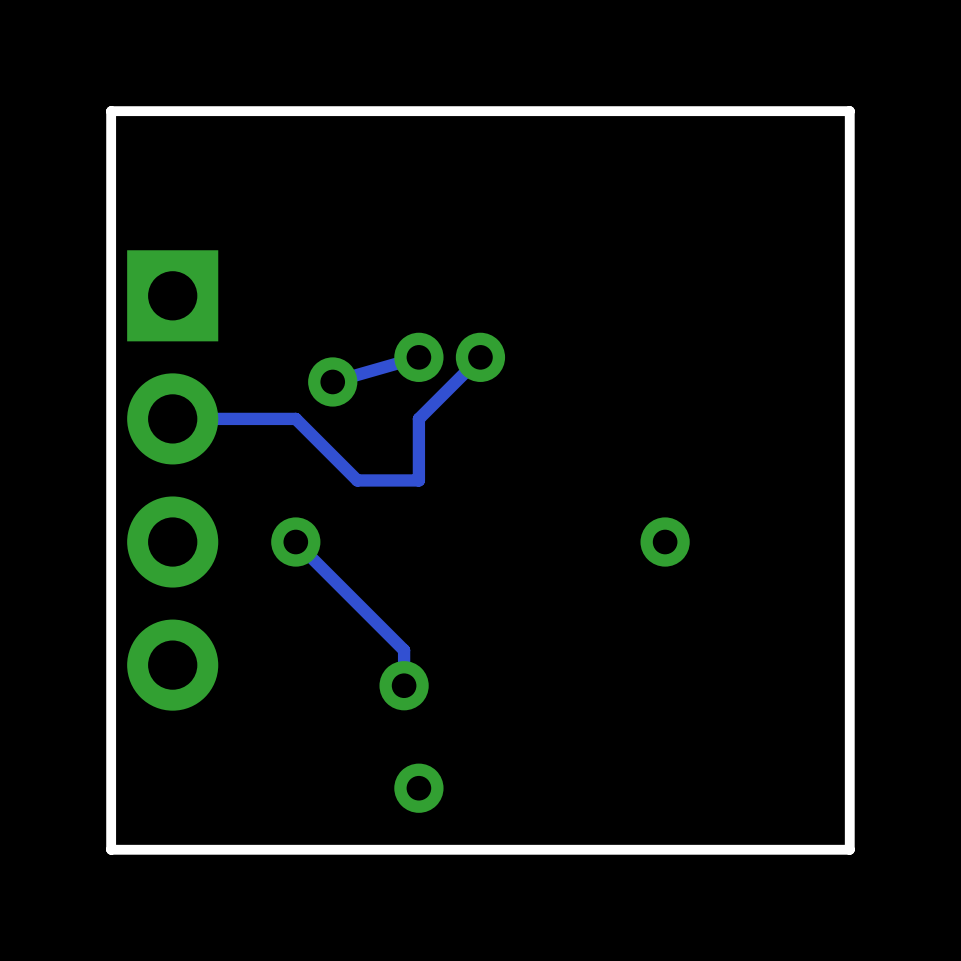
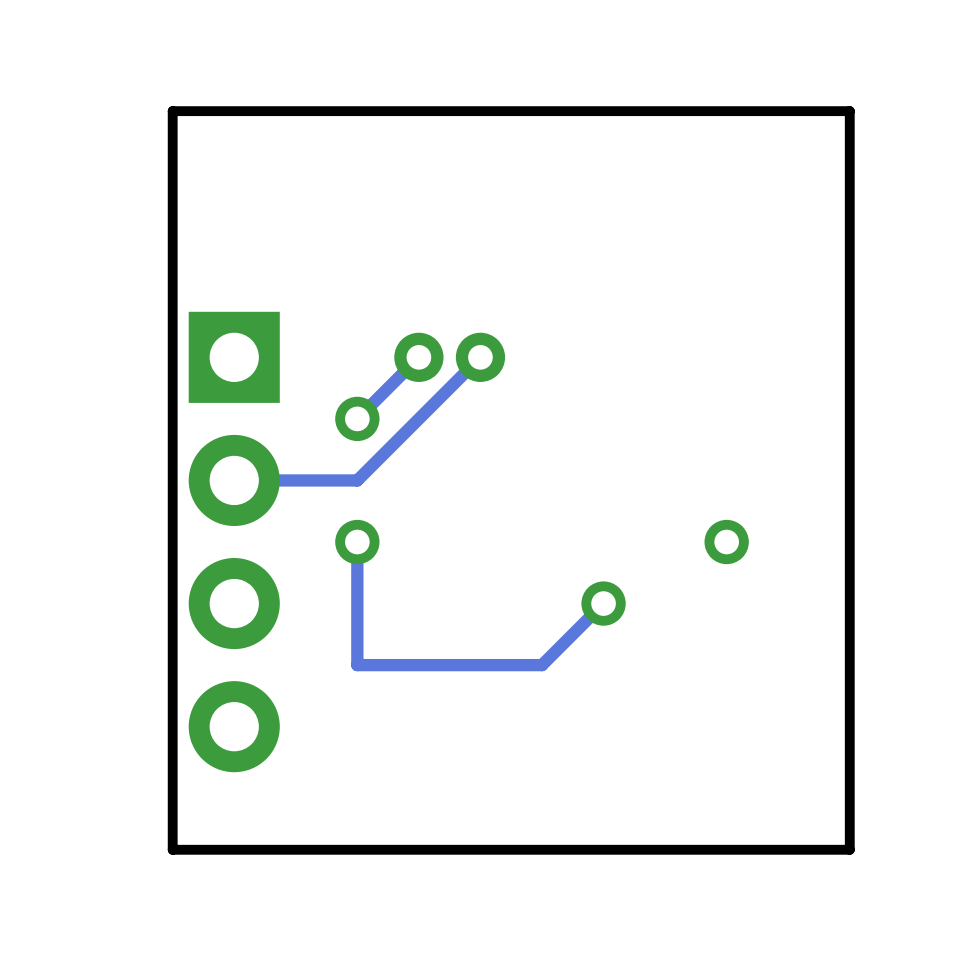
board edge: (172, 111) (111, 111) (111, 849) (172, 849) -> (172, 111) (172, 849)
track: (418, 357) (332, 381) -> (418, 357) (357, 418)
via position: (332, 381) -> (357, 418)
track: (418, 418) (418, 480) (357, 480) (295, 418) (172, 418) -> (418, 418) (357, 480) (234, 480)
part position: (172, 480) -> (234, 542)
track: (295, 542) (404, 650) (404, 685) -> none
via: (295, 542) -> none
track: none -> (357, 542) (357, 665) (542, 665) (603, 603)
via: none -> (357, 542)
via: (665, 542) -> none
via: none -> (726, 542)
via: none -> (603, 603)
via: (404, 685) -> none
via: (418, 788) -> none

